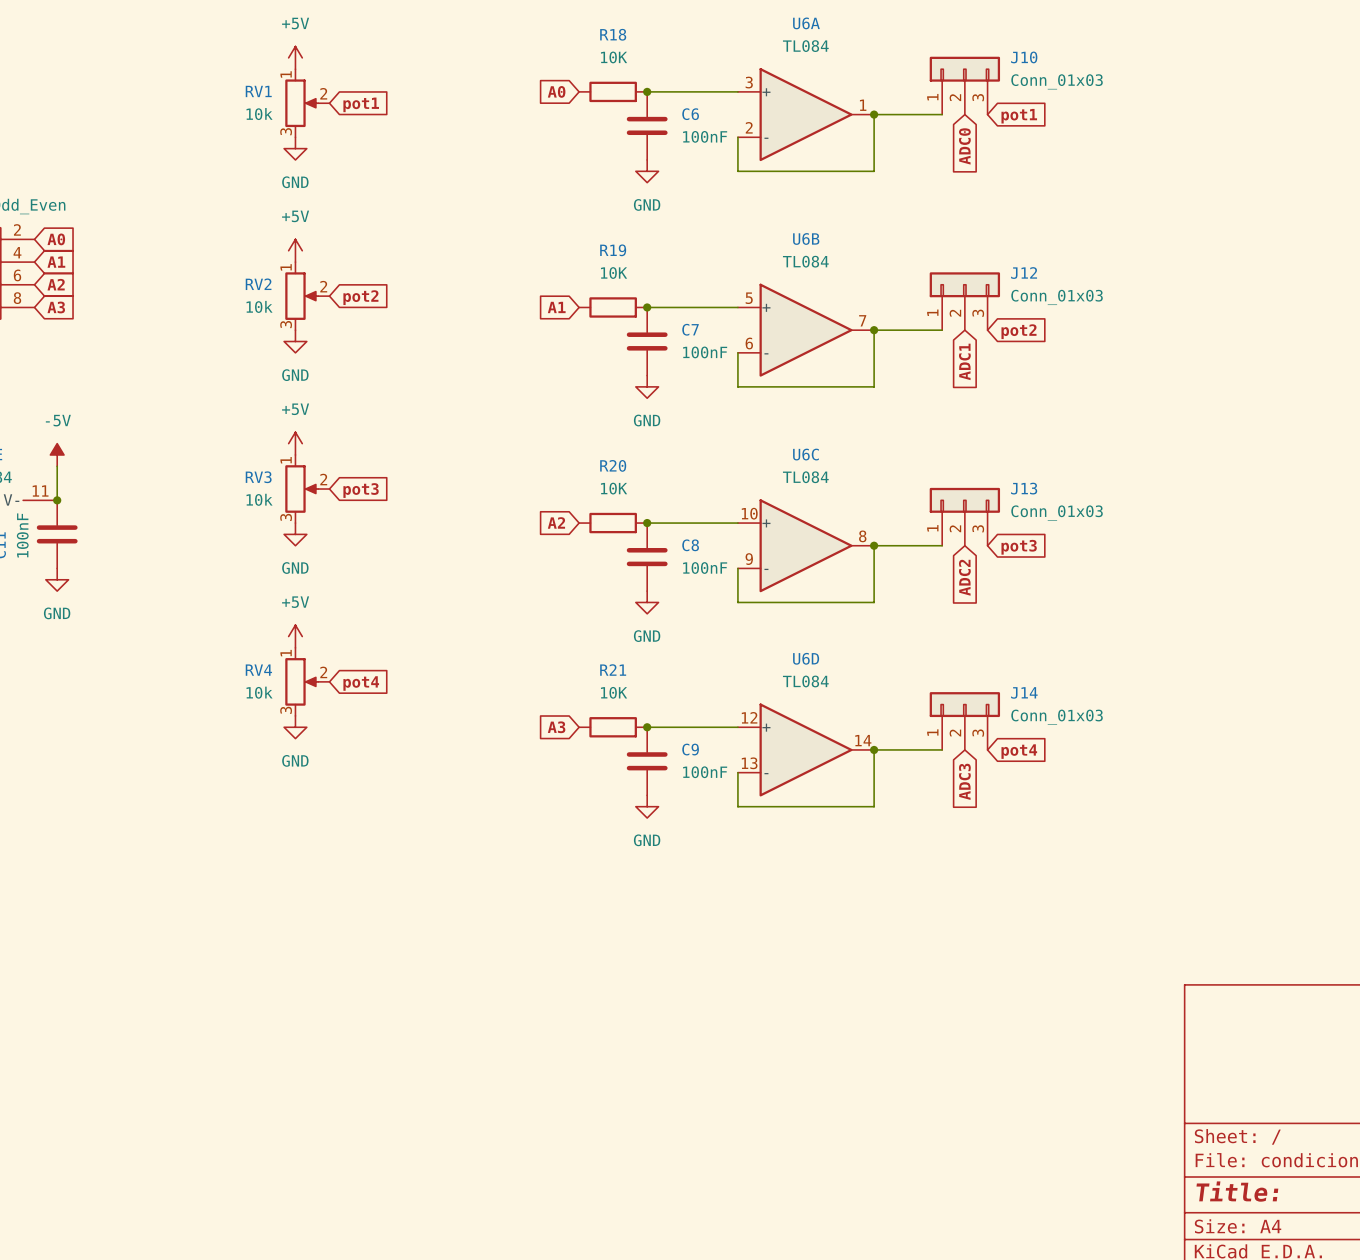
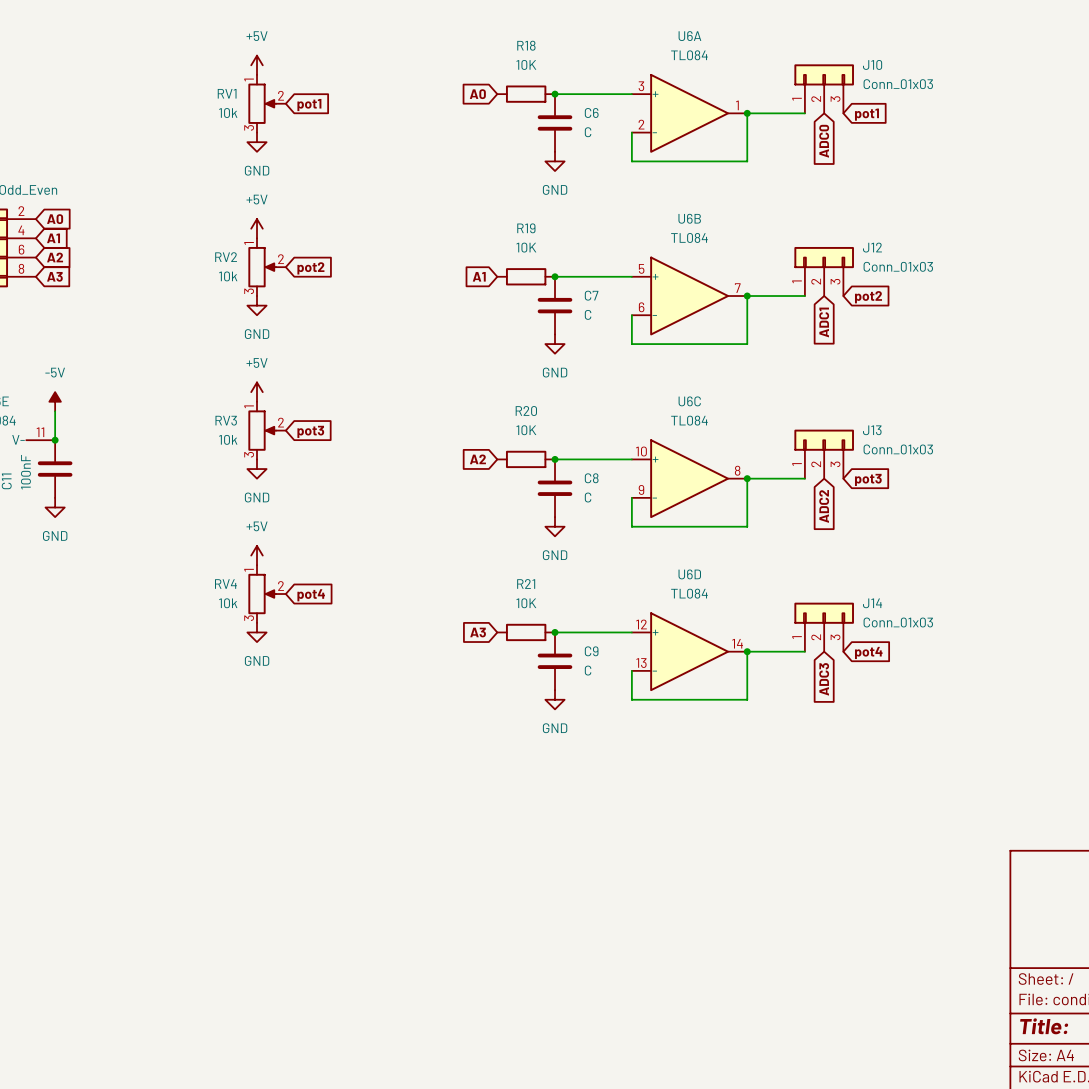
C6 value: 100nF (705, 136) -> C (588, 132)
C7 value: 100nF (705, 352) -> C (588, 314)
C8 value: 100nF (705, 568) -> C (588, 497)
C9 value: 100nF (705, 772) -> C (588, 670)

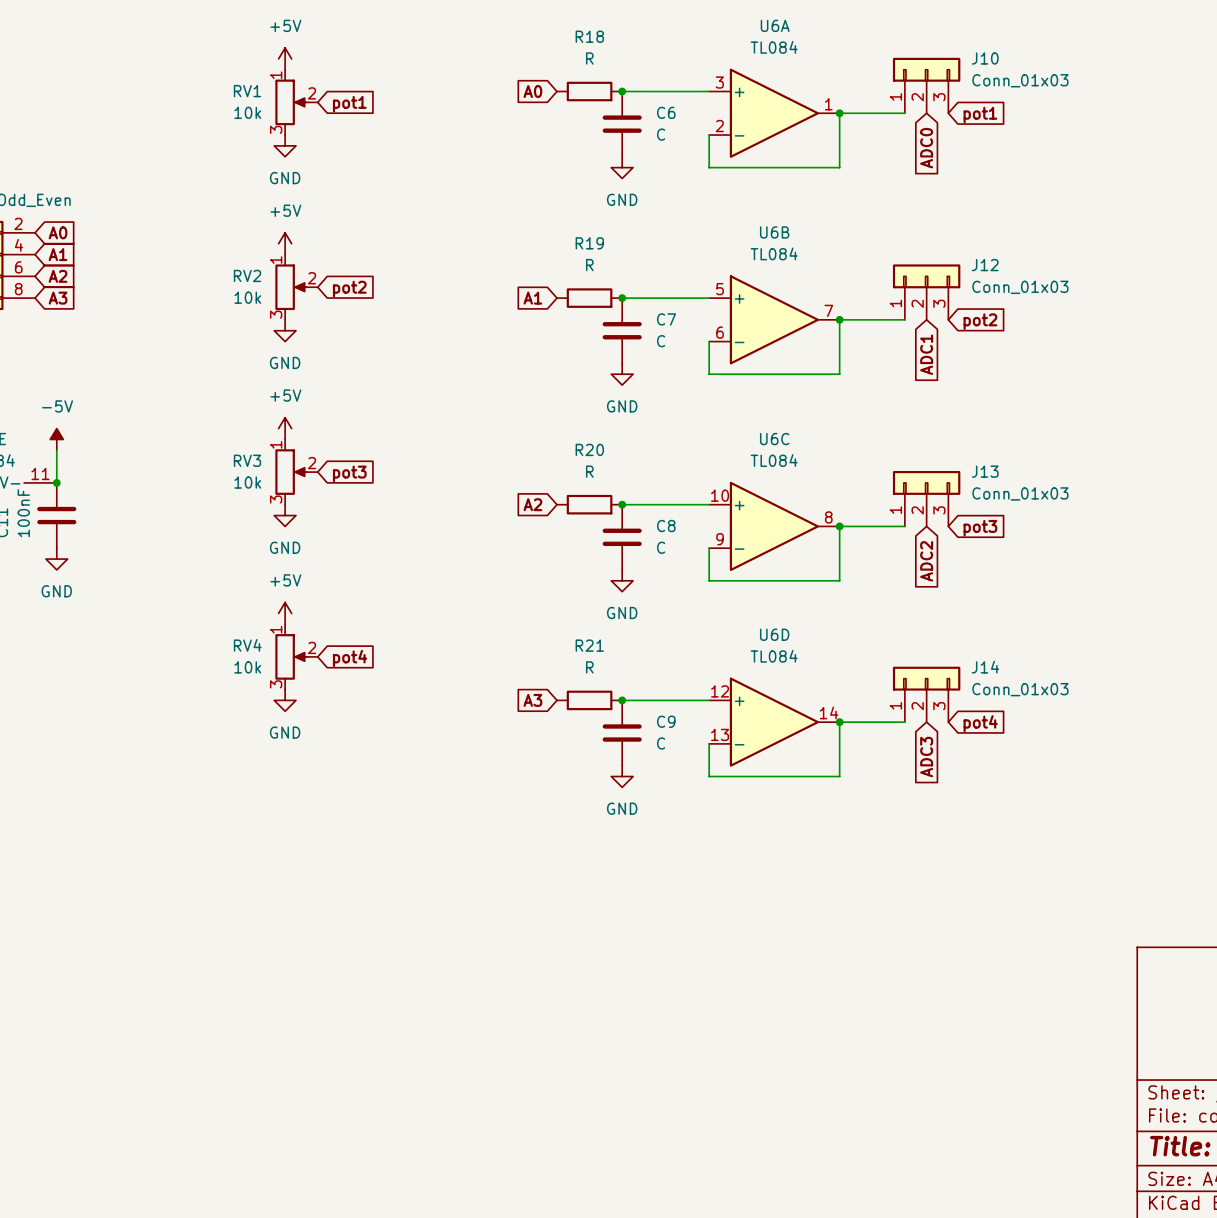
R18 value: 10K (526, 64) -> R (589, 58)
R19 value: 10K (526, 247) -> R (589, 265)
R20 value: 10K (526, 430) -> R (589, 471)
R21 value: 10K (526, 603) -> R (589, 667)

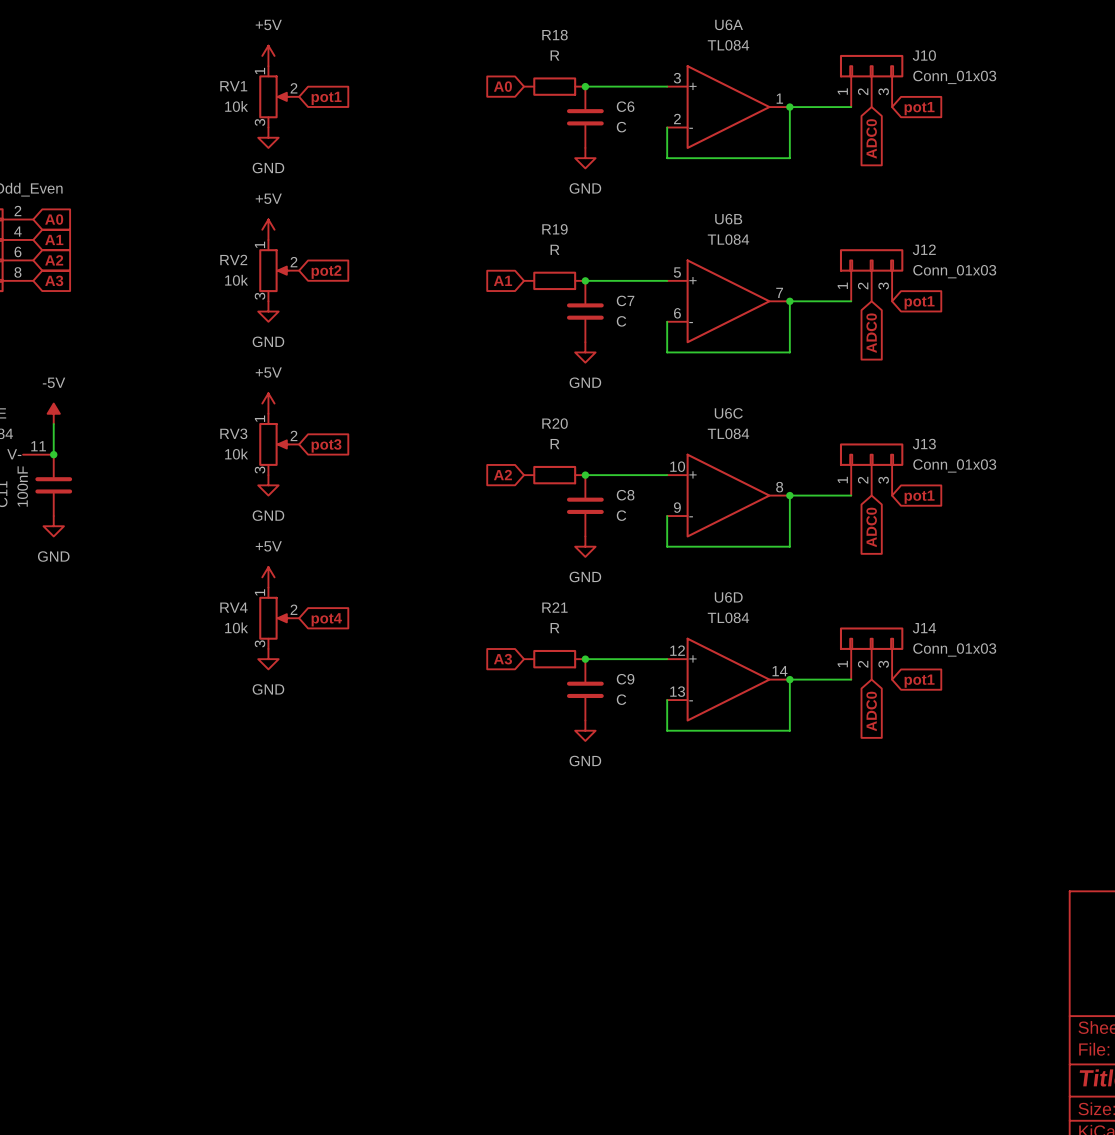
global label: pot2 (980, 321) -> pot1 (919, 302)
global label: ADC1 (926, 354) -> ADC0 (871, 333)
global label: pot3 (980, 528) -> pot1 (919, 497)
global label: ADC2 (926, 561) -> ADC0 (871, 527)
global label: pot4 (980, 723) -> pot1 (919, 681)
global label: ADC3 (926, 757) -> ADC0 (871, 711)

